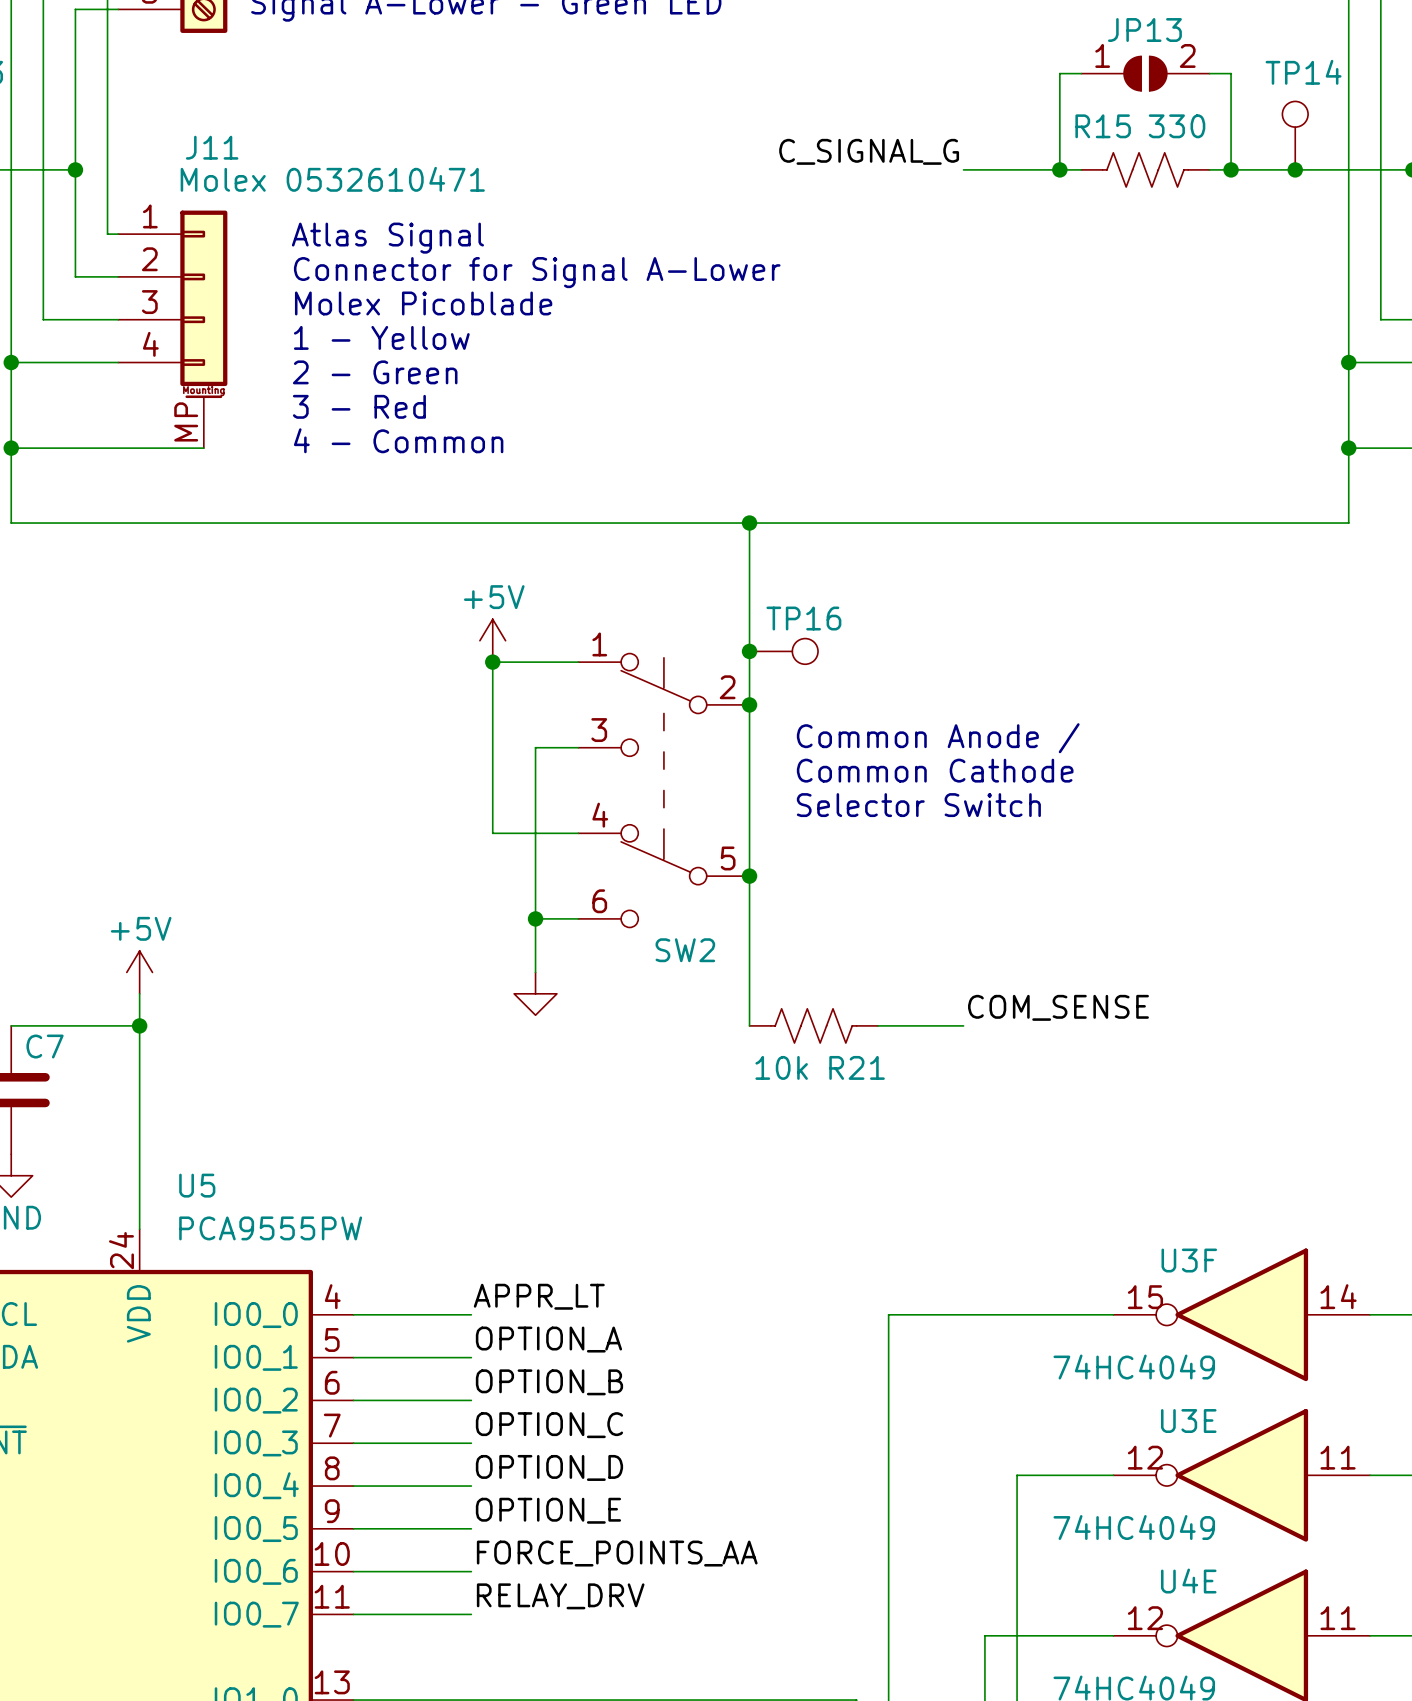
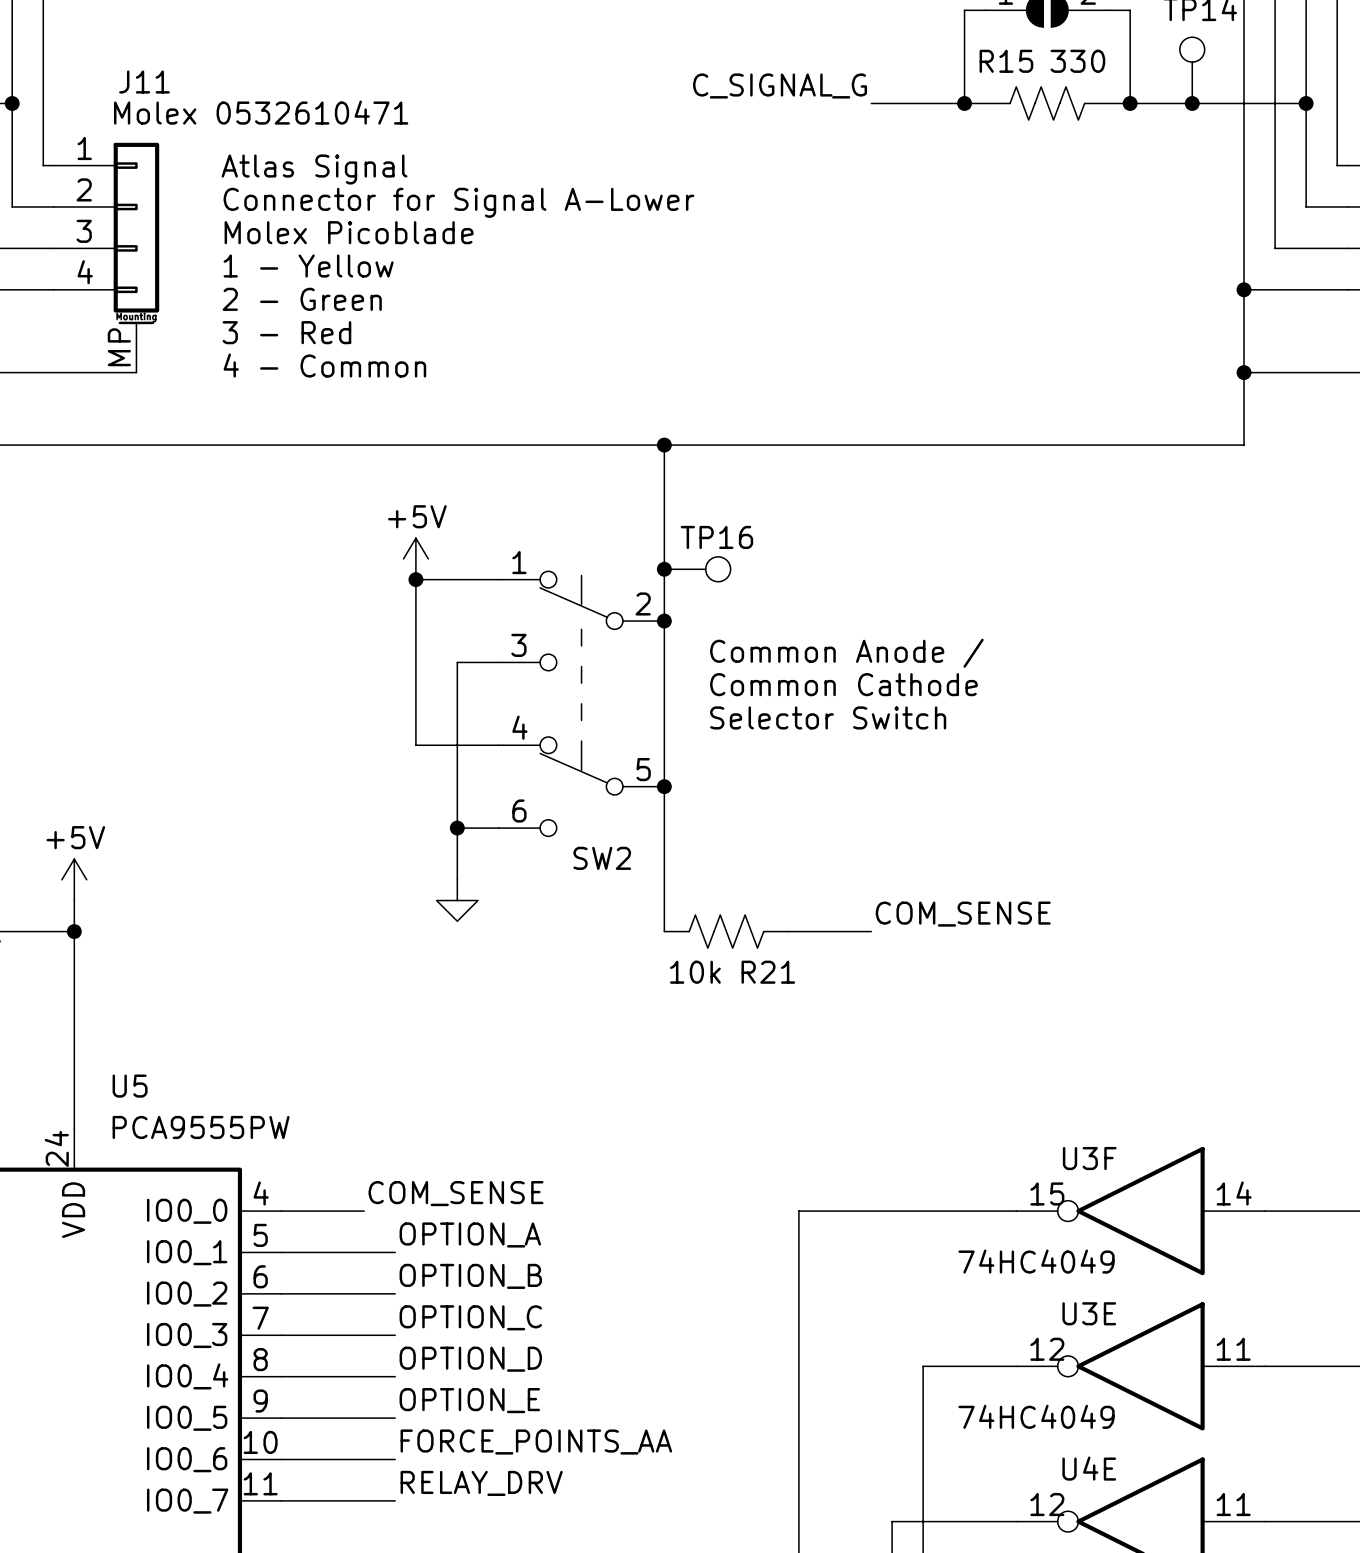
label: none -> COM_SENSE (456, 1193)
label: APPR_LT (539, 1296) -> none
wire: (439, 1314) (471, 1314) -> none

